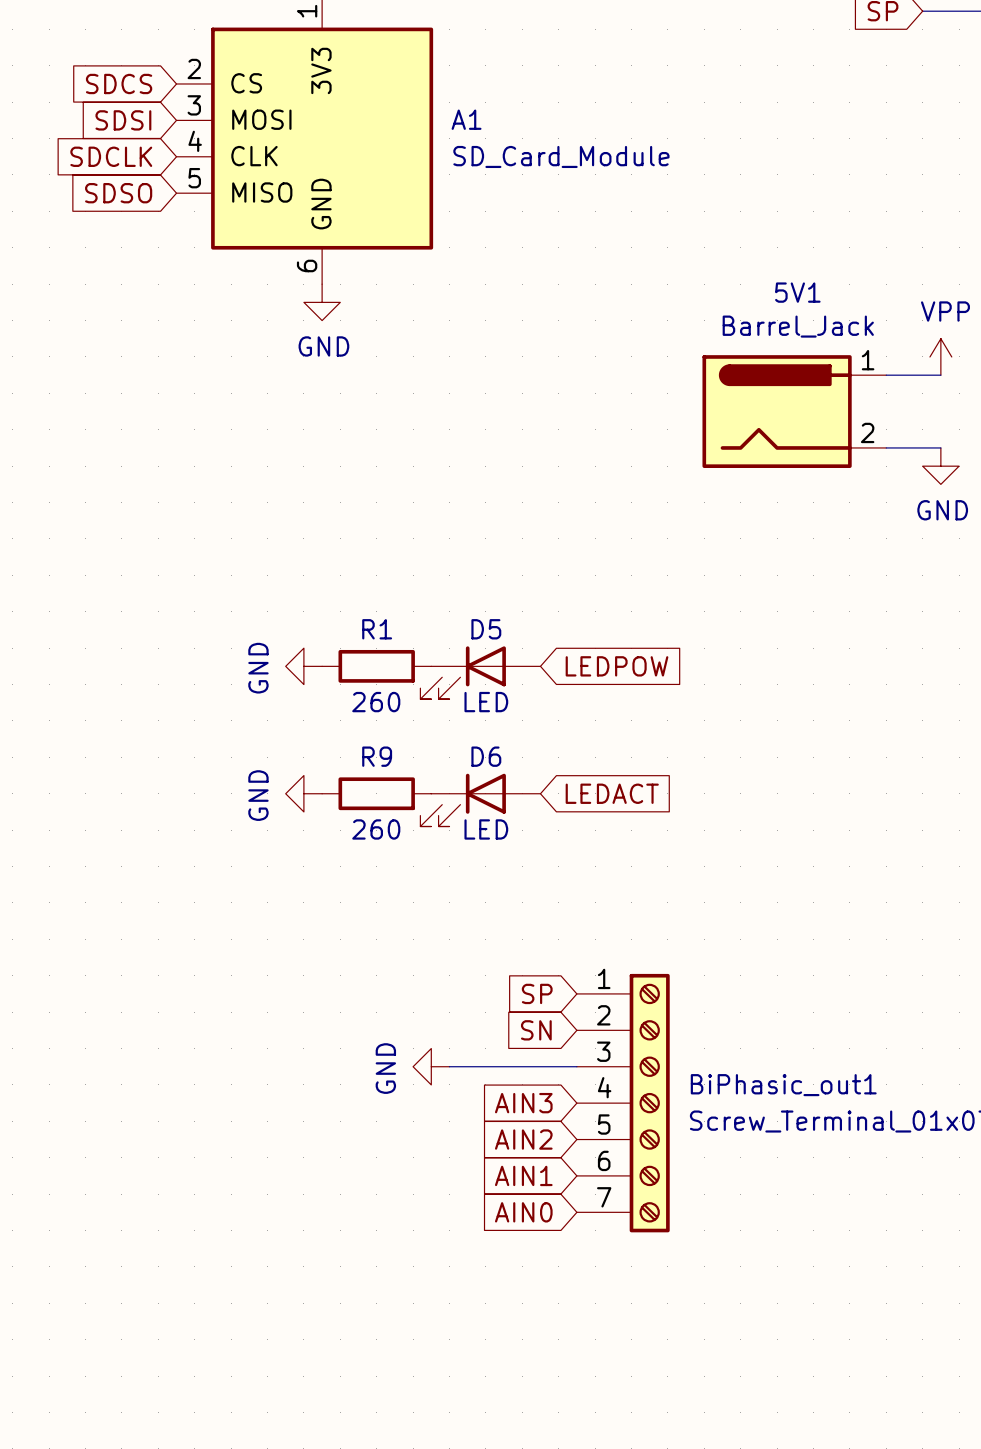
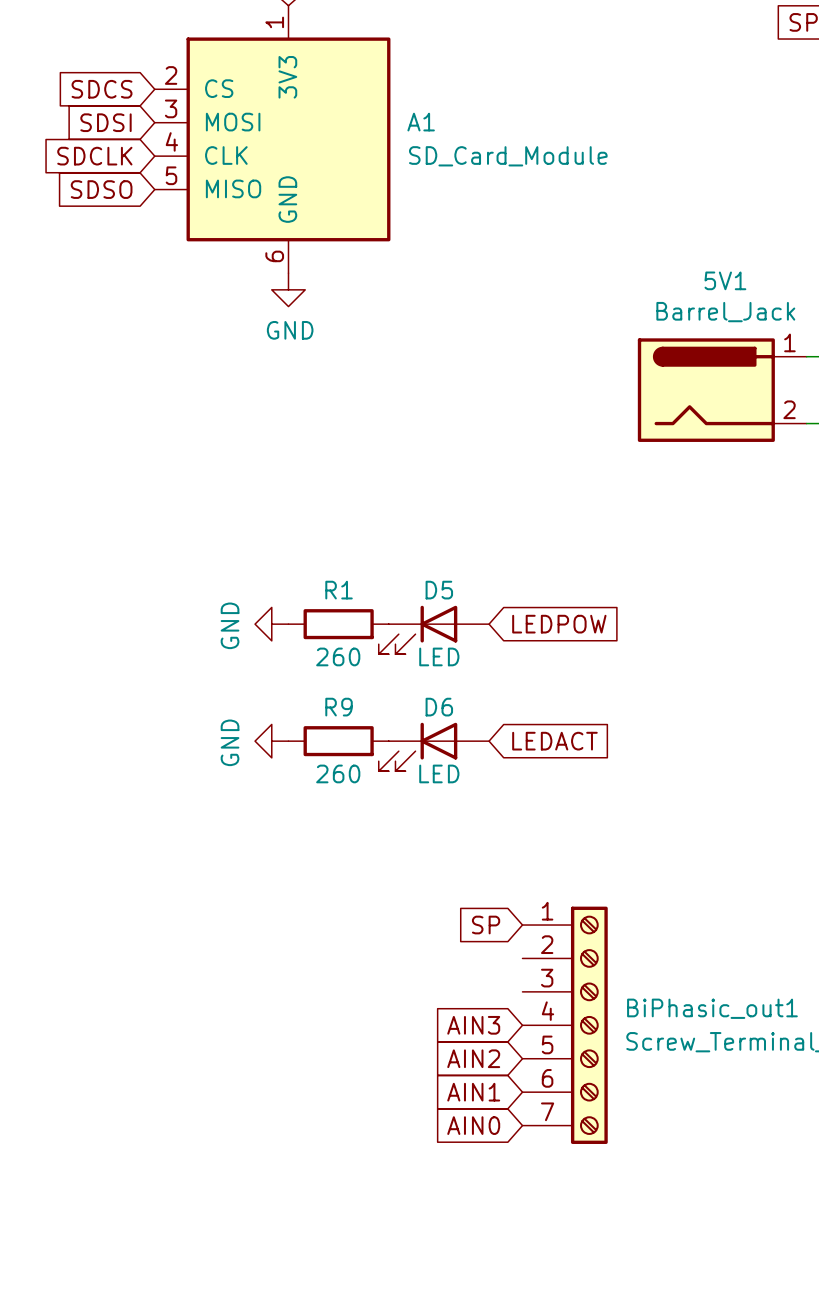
global label: SN (536, 1030) -> none
power symbol: GND (431, 1066) -> none
wire: (449, 1066) (576, 1066) -> none

